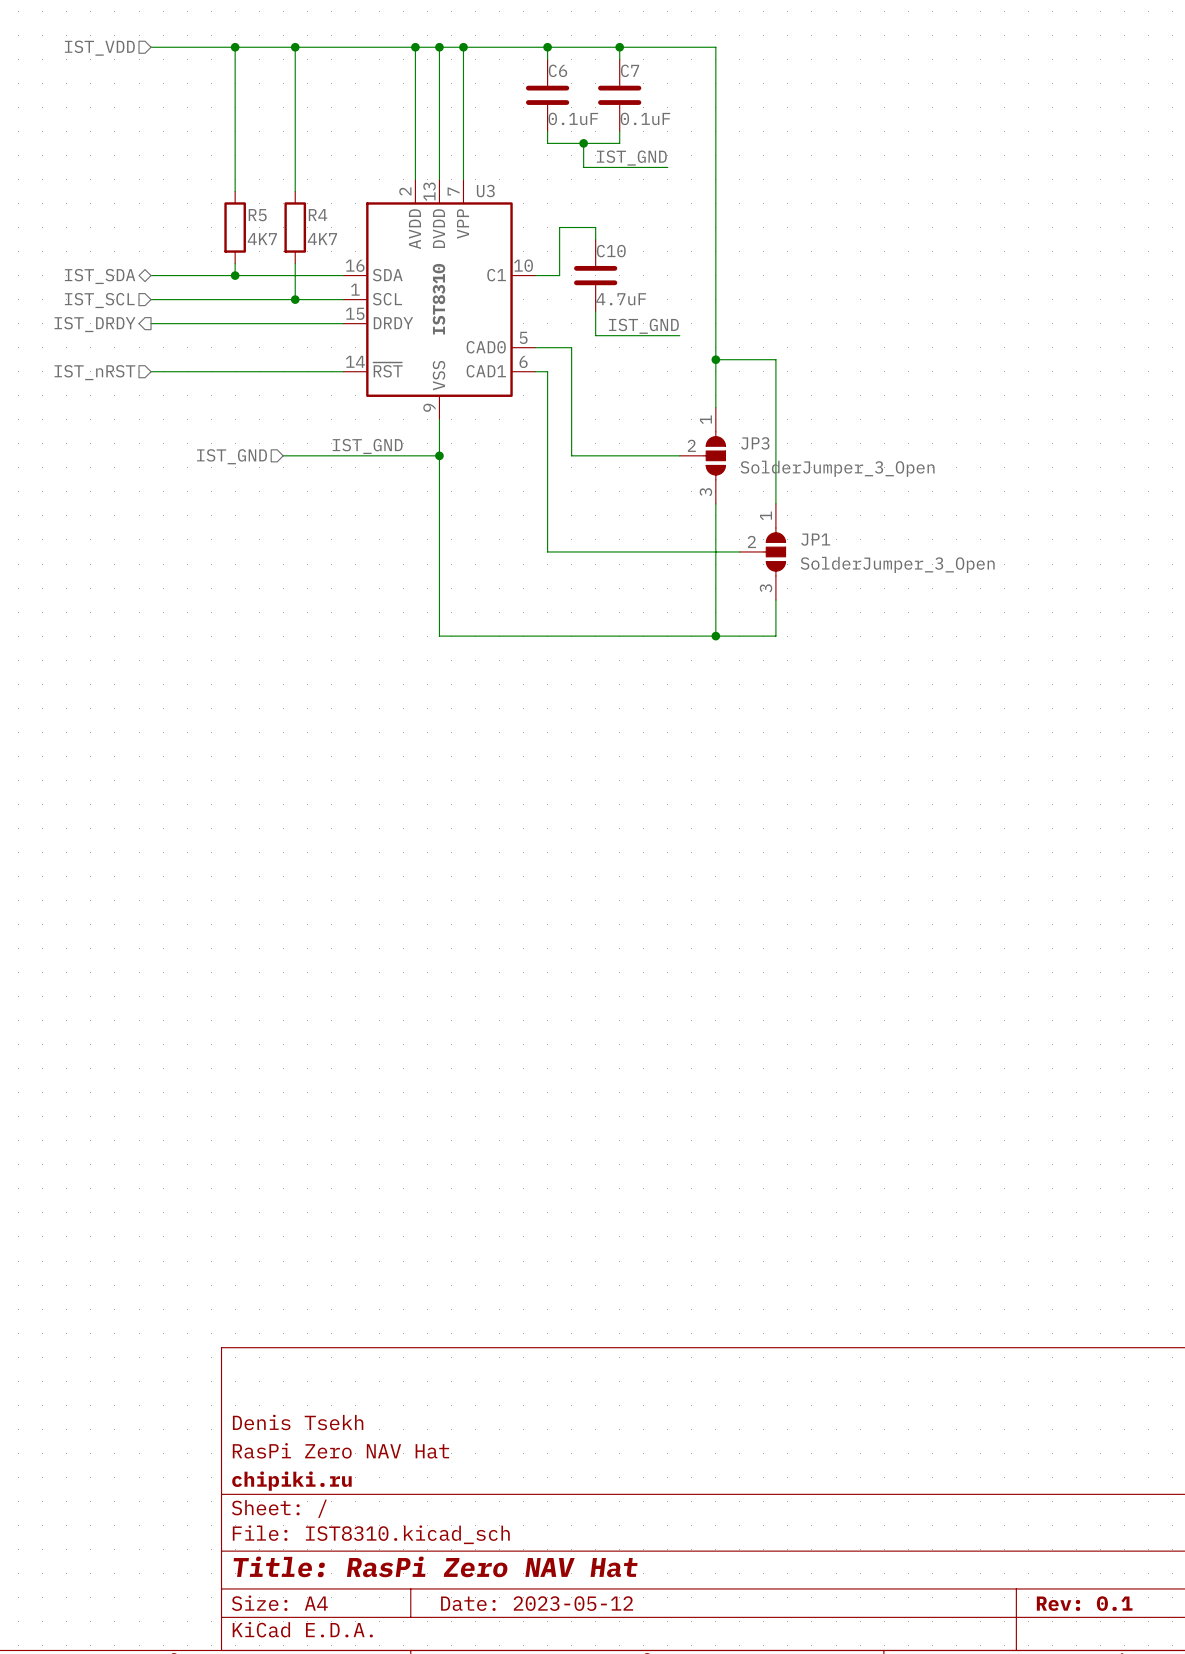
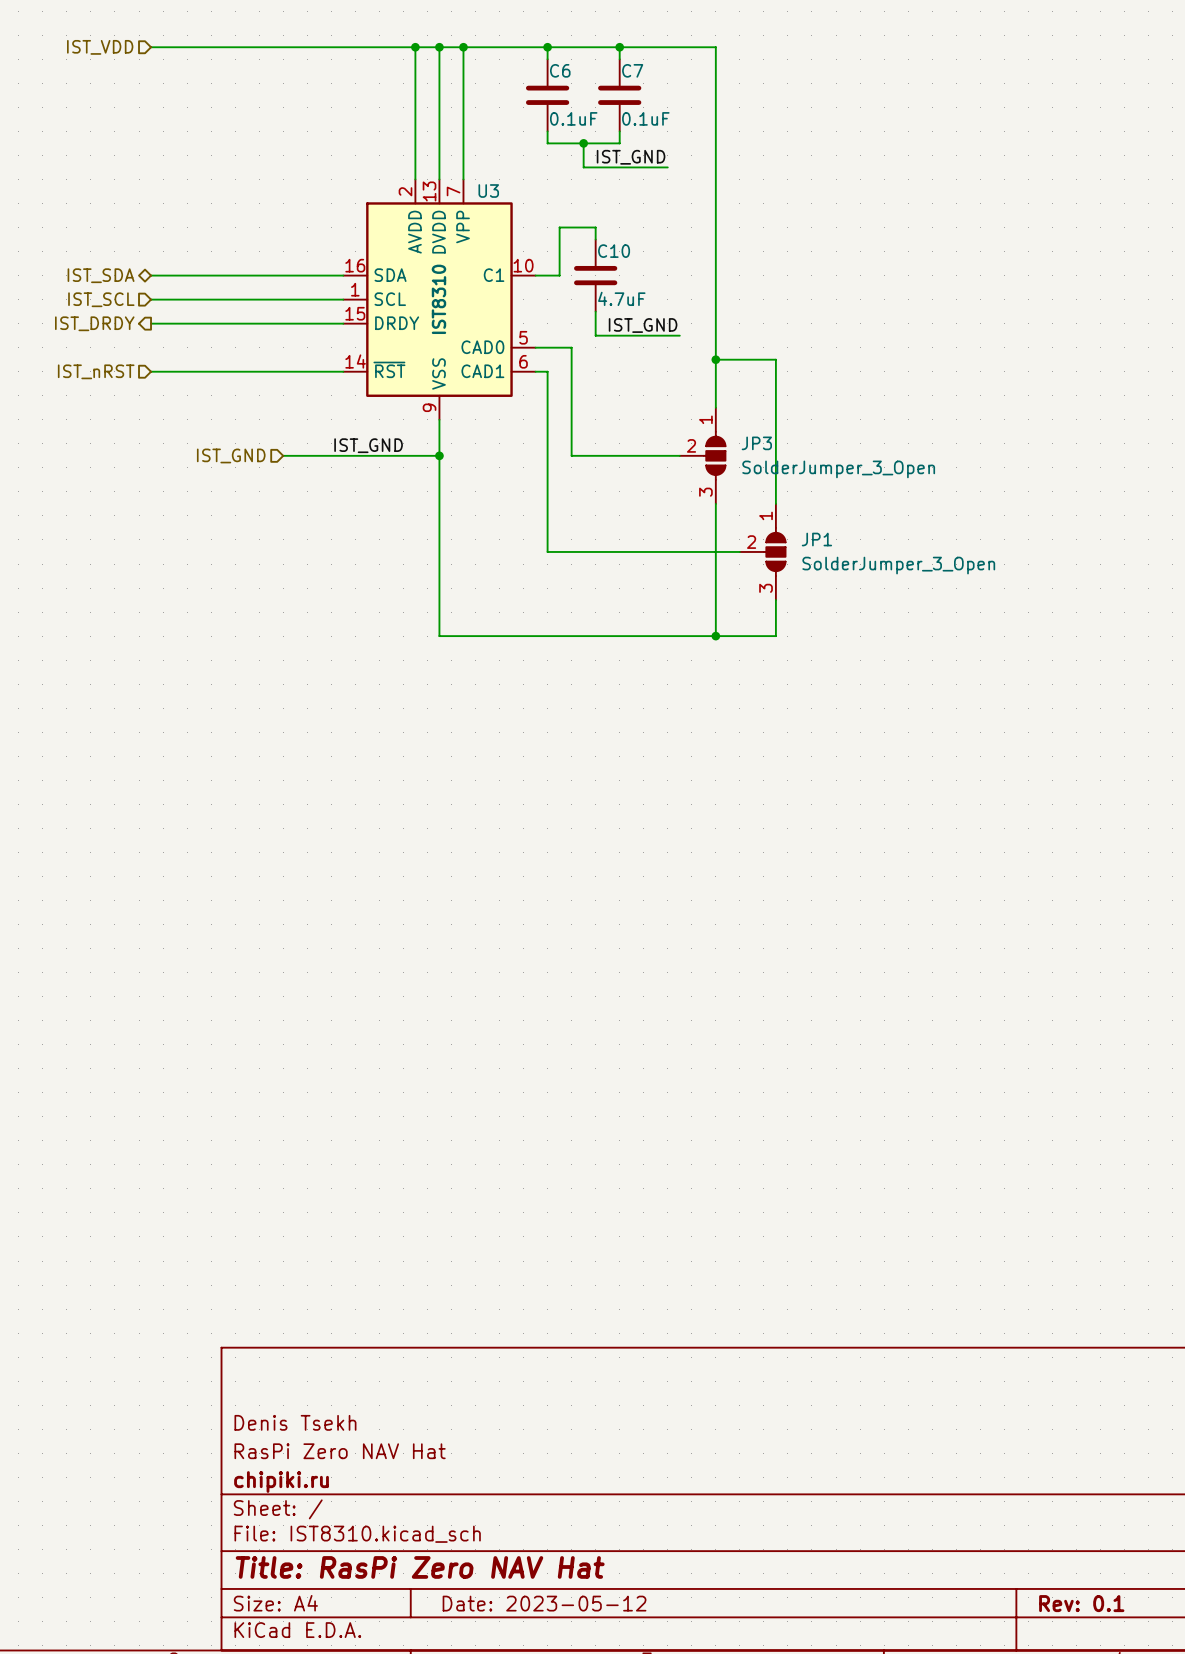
wire: (235, 47) (235, 191) -> none
junction: (235, 47) -> none
wire: (295, 47) (295, 191) -> none
junction: (295, 47) -> none
R5: 4K7 (235, 227) -> none
R4: 4K7 (295, 227) -> none
wire: (235, 263) (235, 275) -> none
wire: (295, 263) (295, 299) -> none
junction: (235, 275) -> none
junction: (295, 299) -> none

